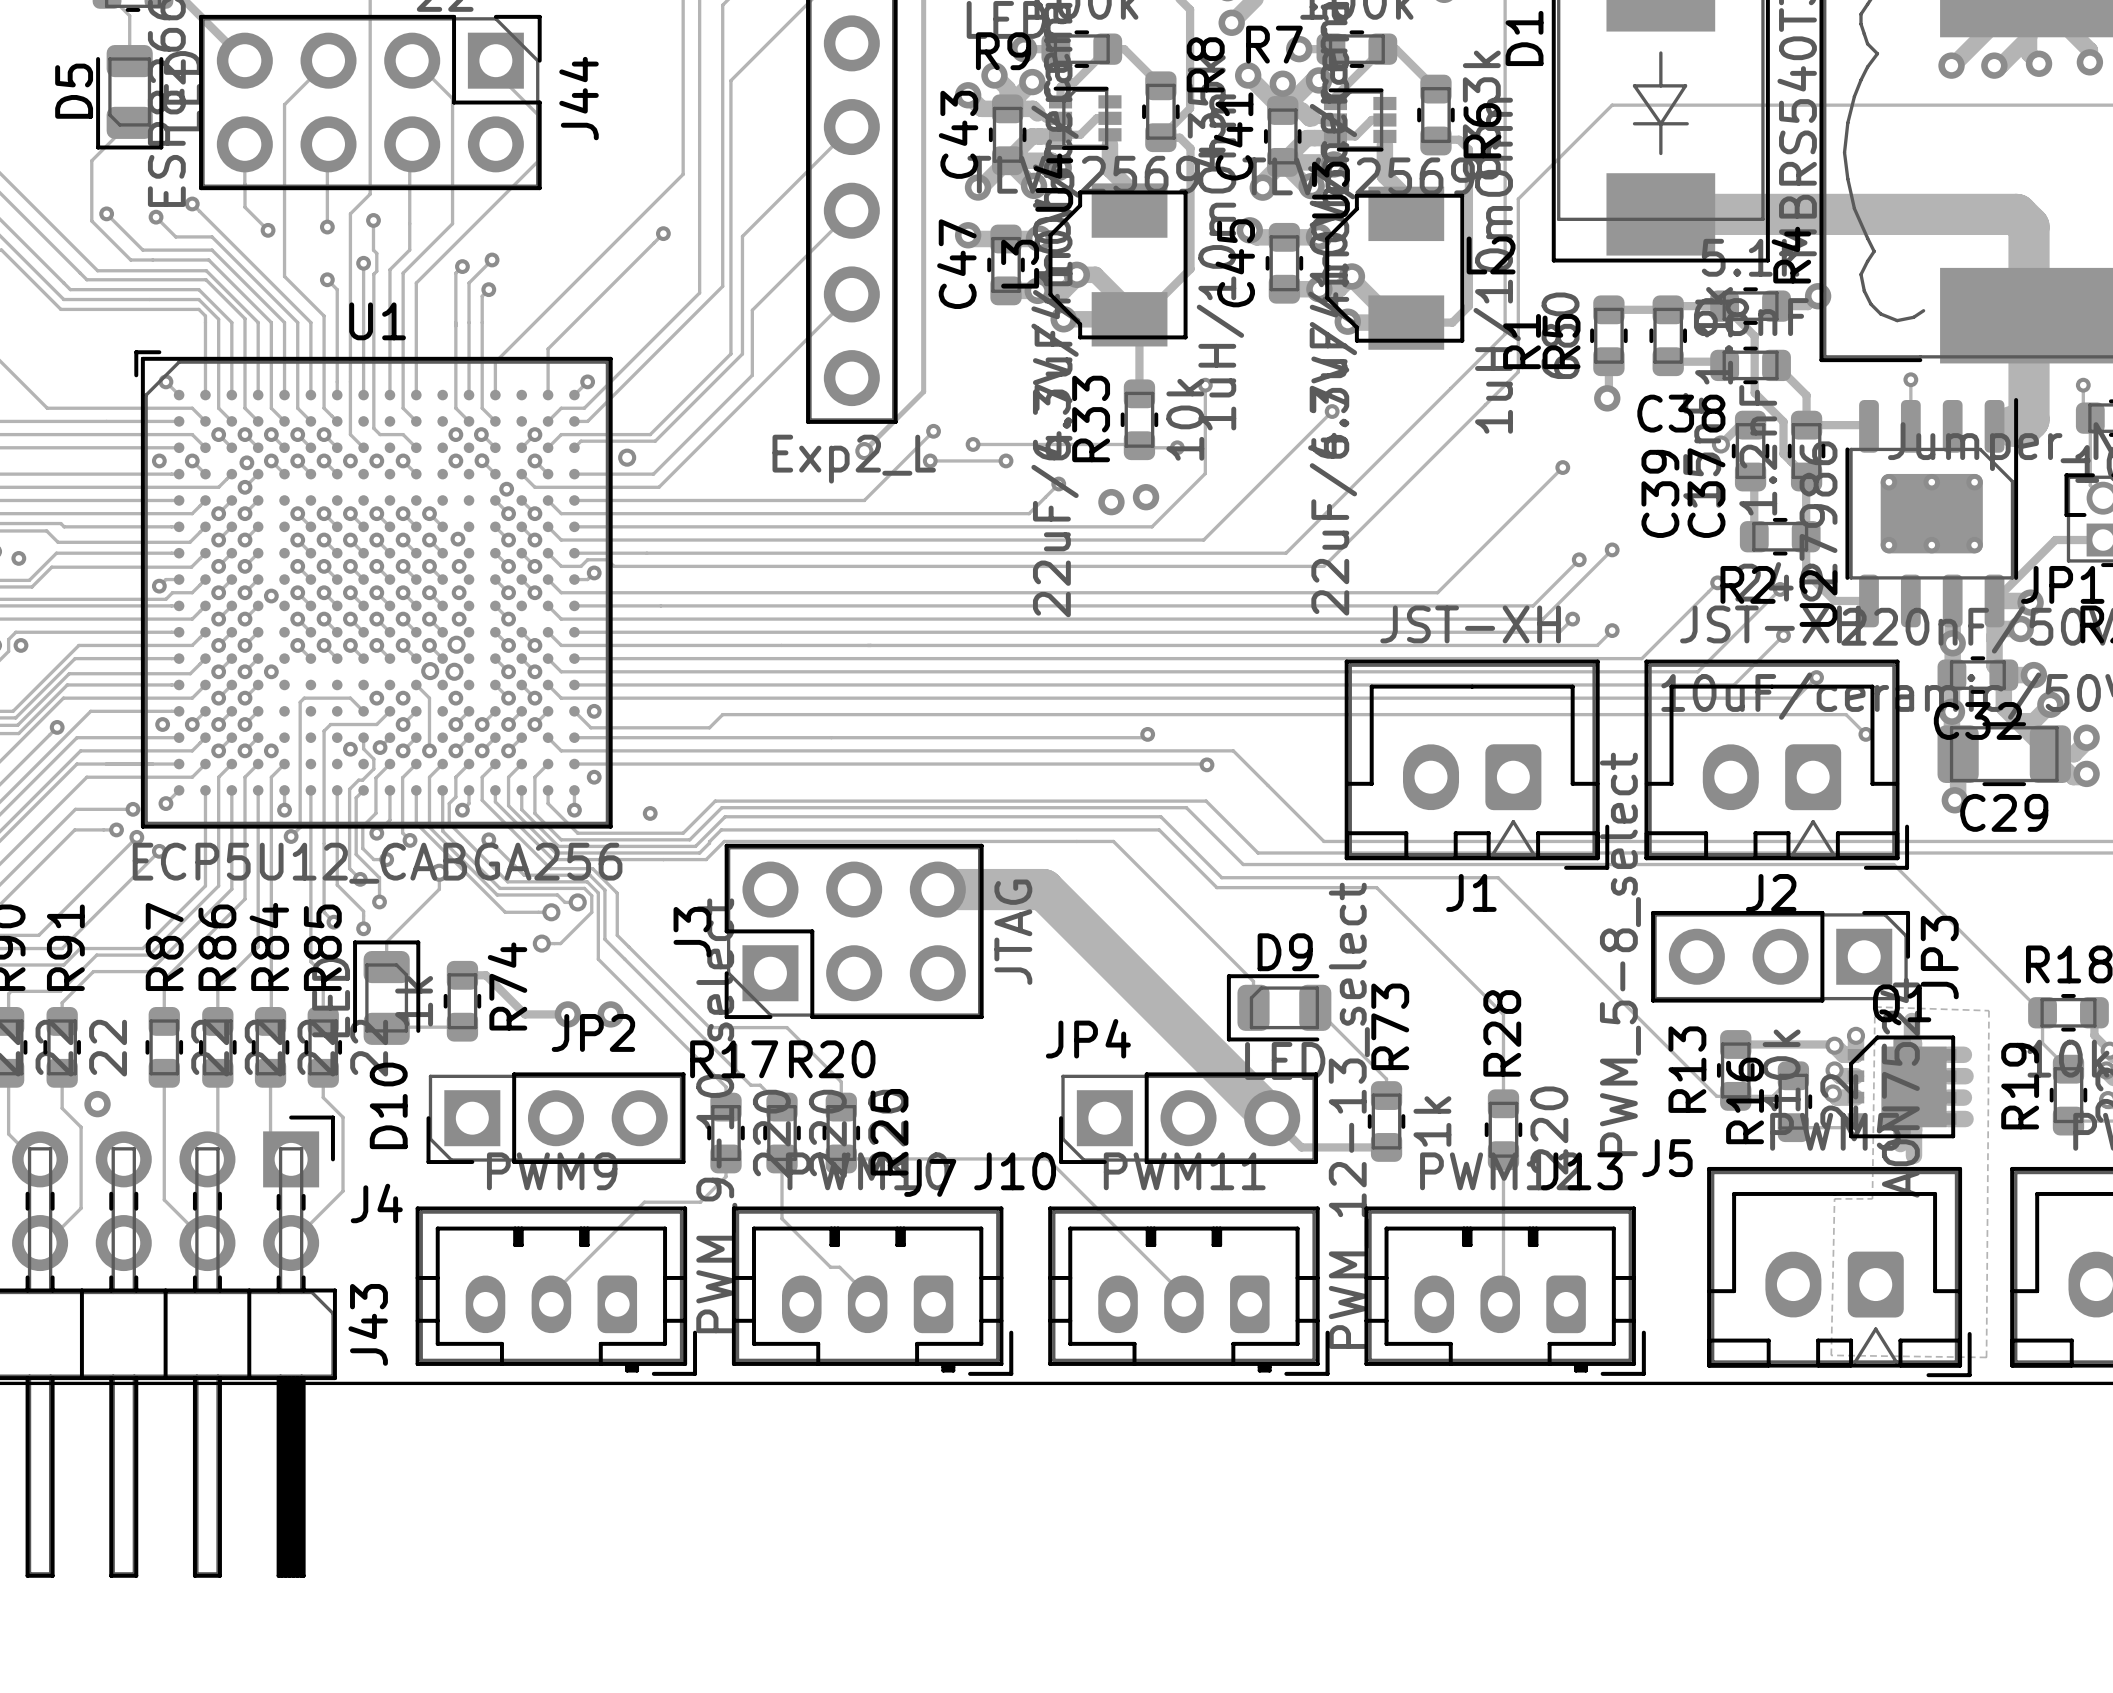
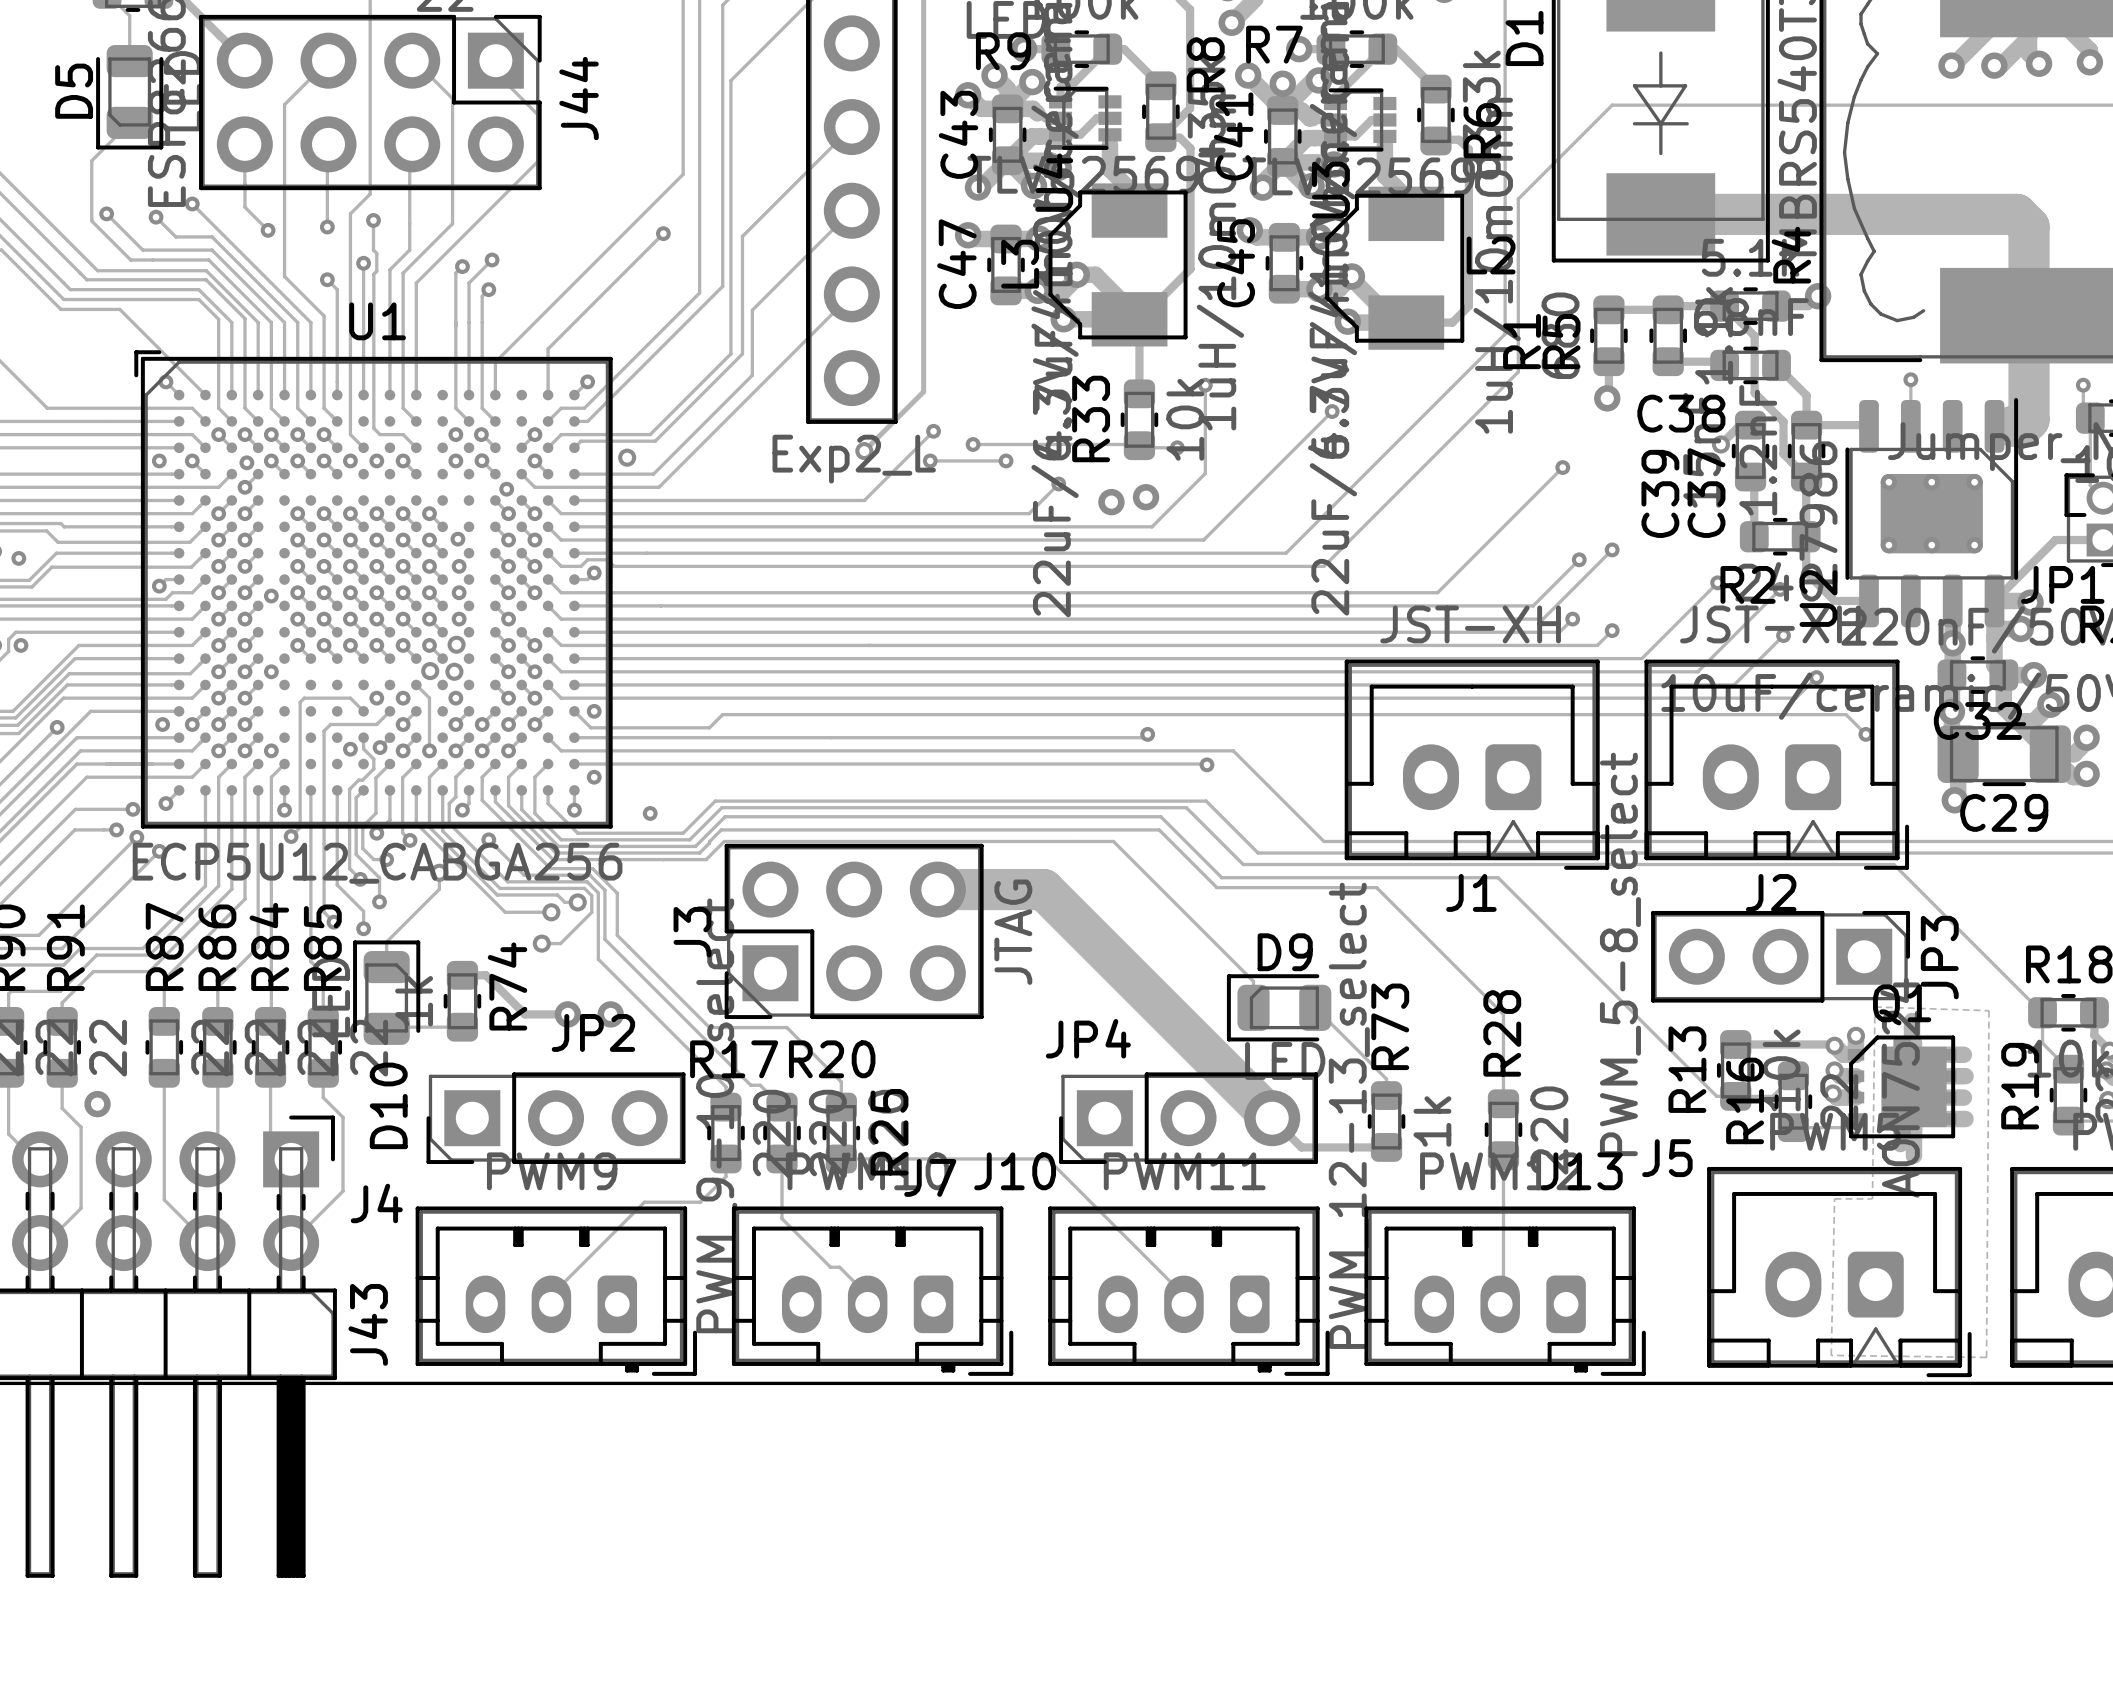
track: (119, 309) (198, 309) (205, 316) (205, 395) -> (119, 309) (205, 395)

